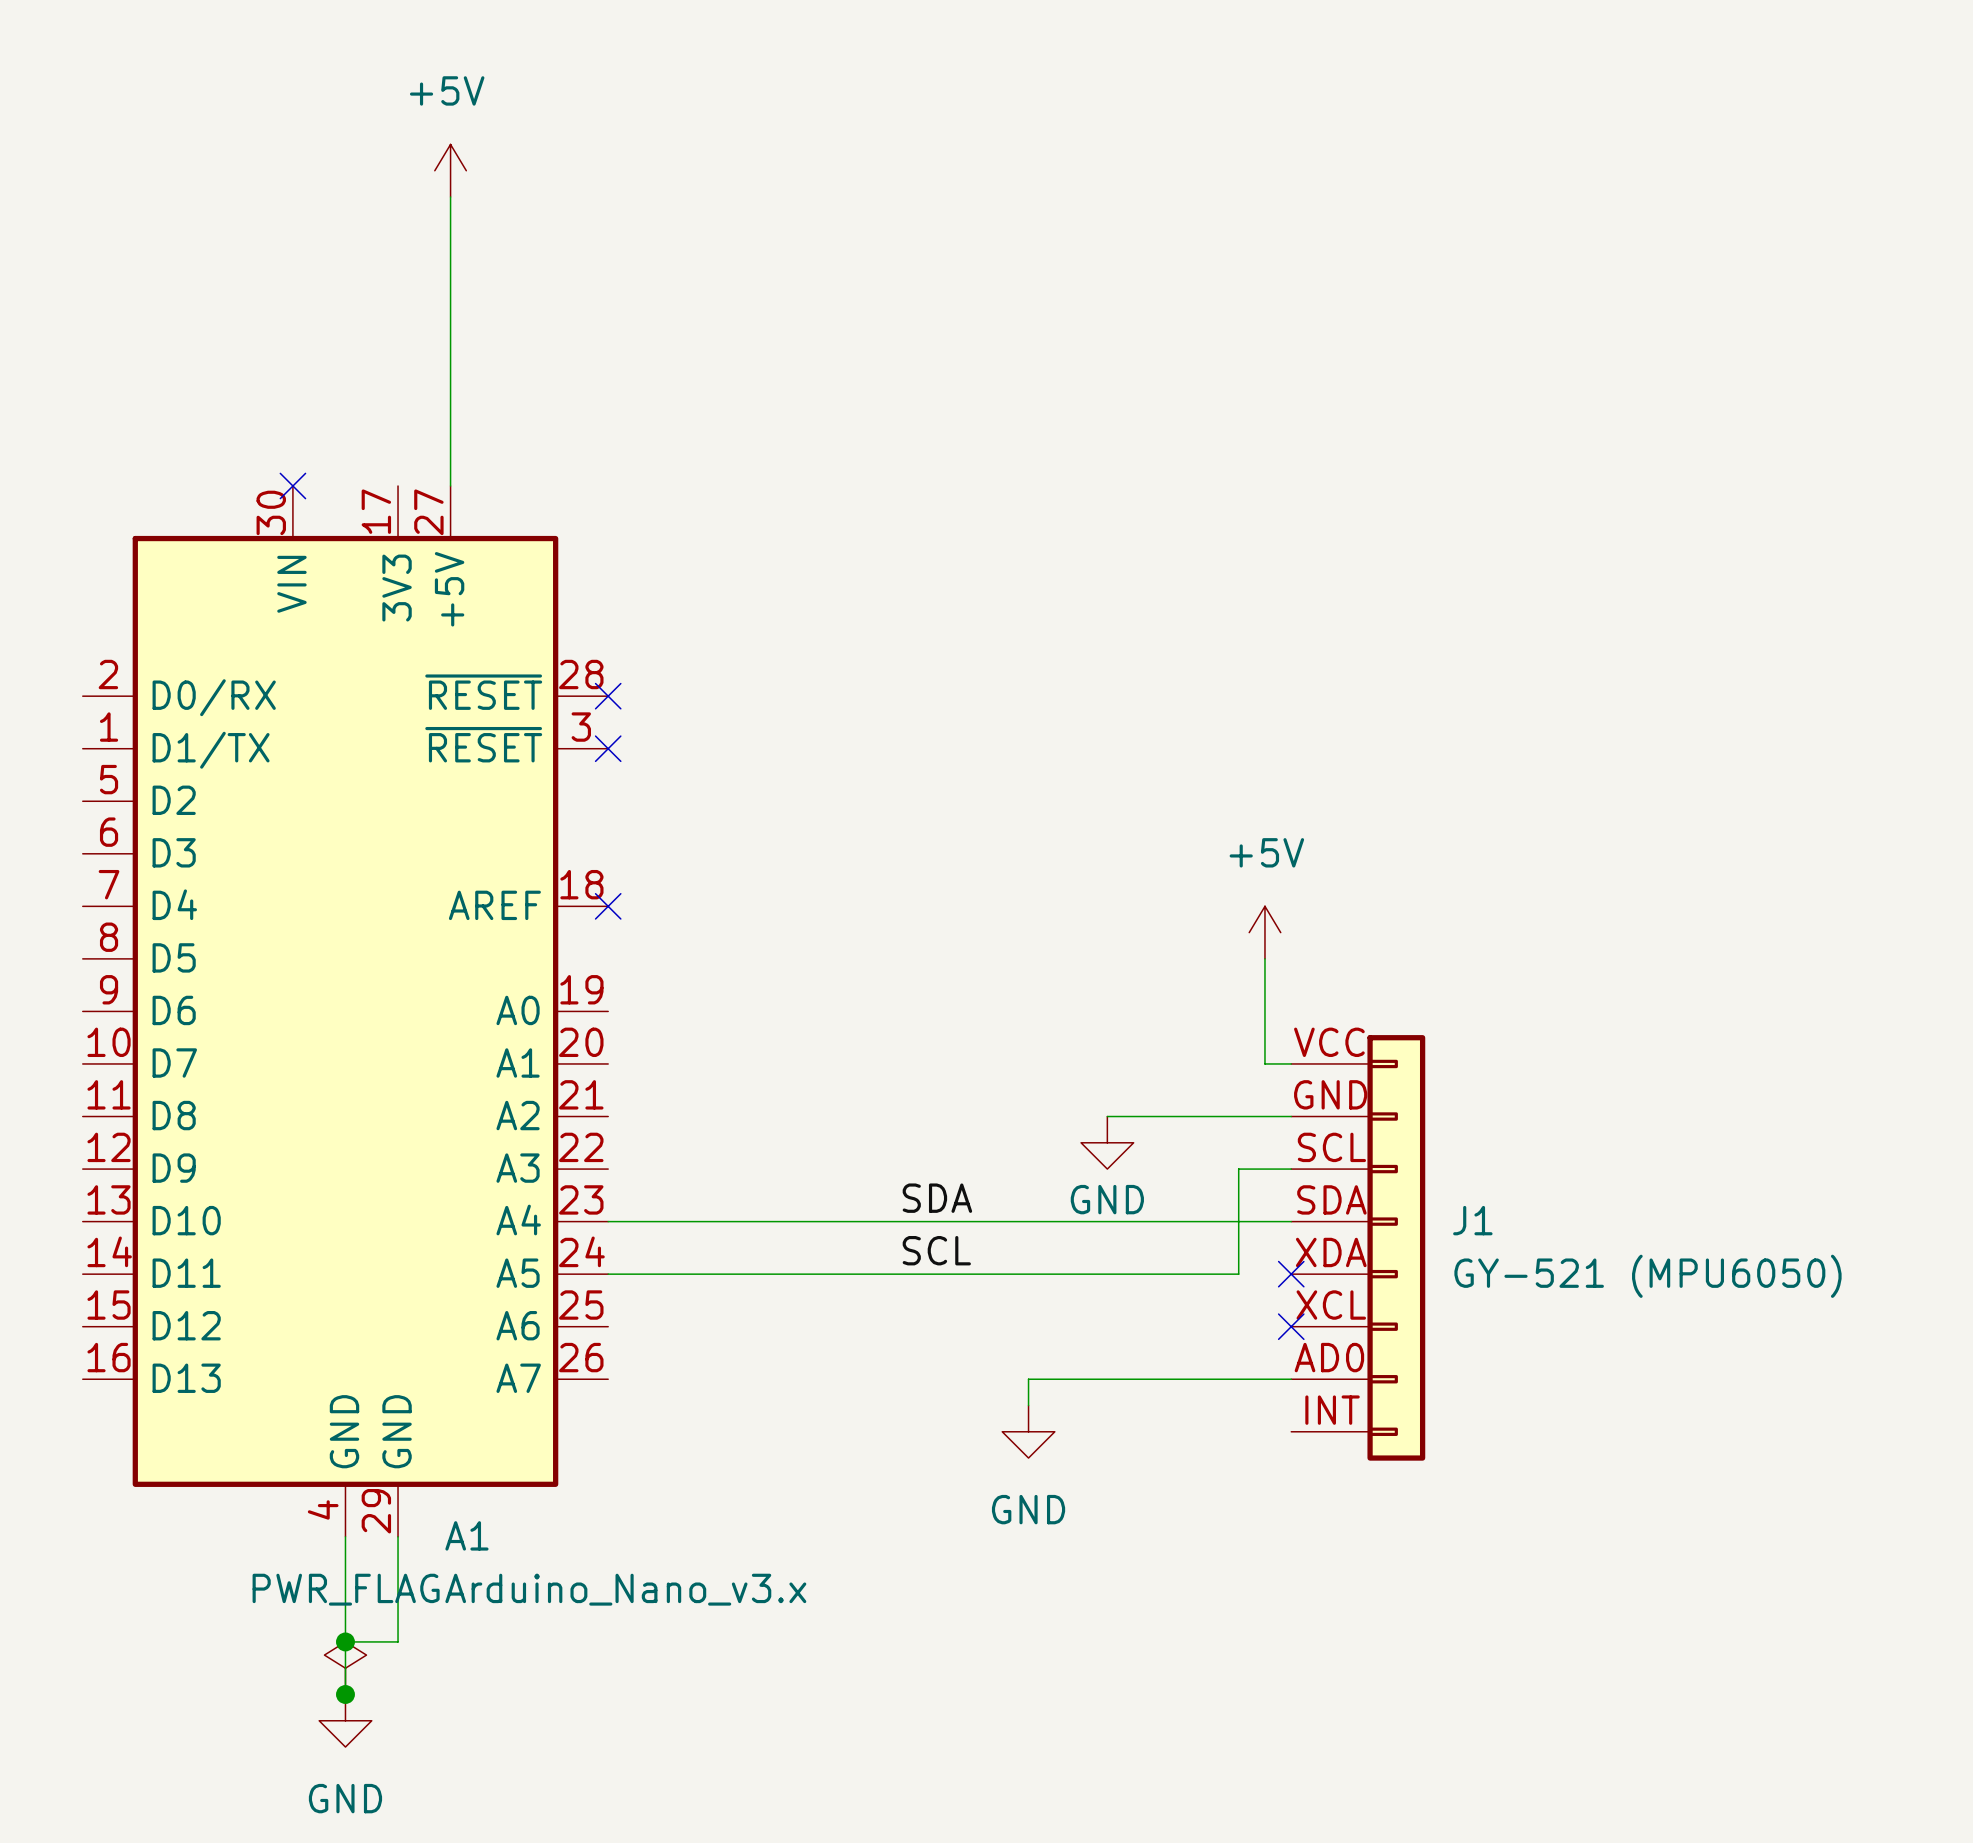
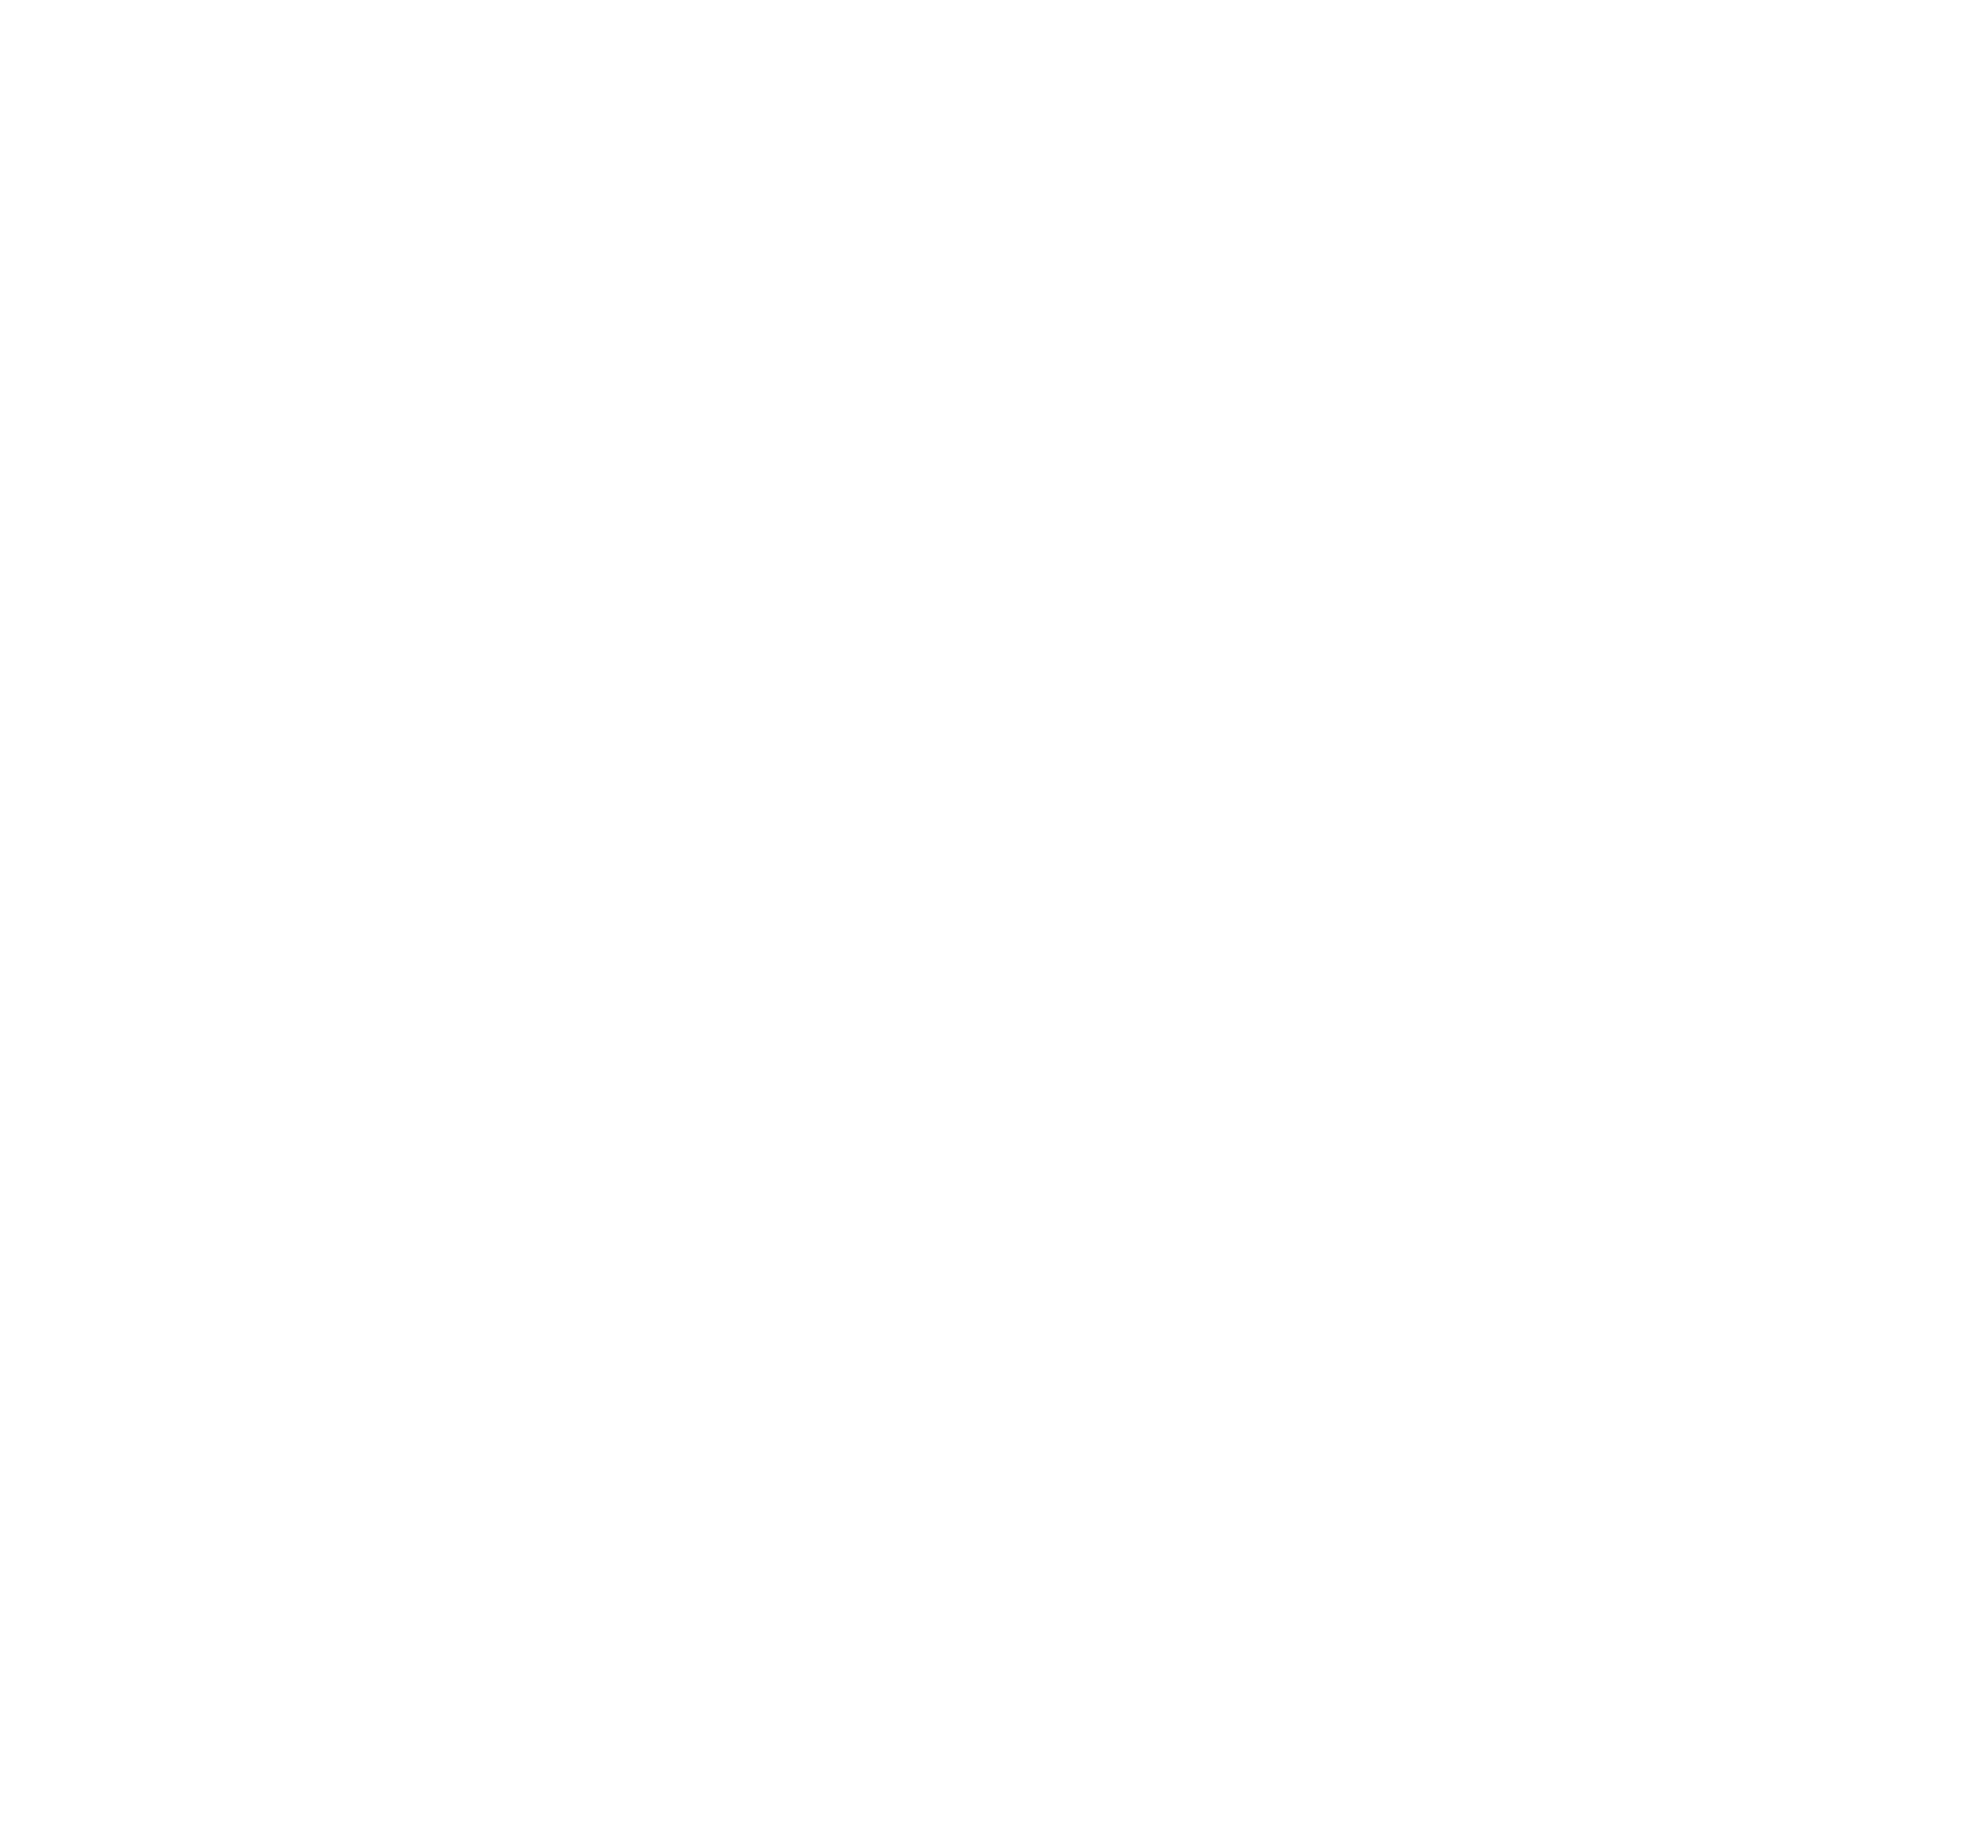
power symbol: +5V (450, 170) -> none
wire: (450, 197) (450, 486) -> none
no-connect mark: (292, 486) -> none
no-connect mark: (608, 696) -> none
no-connect mark: (608, 748) -> none
no-connect mark: (608, 906) -> none
power symbol: +5V (1264, 932) -> none
wire: (1264, 958) (1264, 1063) (1291, 1063) -> none
A1: Arduino_Nano_v3.x (345, 1011) -> none
wire: (1107, 1116) (1291, 1116) -> none
power symbol: GND (1107, 1142) -> none
wire: (1291, 1169) (1238, 1169) (1238, 1274) (608, 1274) -> none
label: SDA (937, 1198) -> none
wire: (608, 1221) (1291, 1221) -> none
J1: GY-521 (MPU6050) (1358, 1247) -> none
label: SCL (936, 1250) -> none
no-connect mark: (1291, 1274) -> none
no-connect mark: (1291, 1326) -> none
wire: (1291, 1379) (1028, 1379) (1028, 1405) -> none
power symbol: GND (1028, 1431) -> none
wire: (345, 1536) (345, 1694) -> none
wire: (398, 1536) (398, 1641) (345, 1641) -> none
junction: (345, 1641) -> none
power symbol: PWR_FLAG (345, 1668) -> none
junction: (345, 1694) -> none
power symbol: GND (345, 1720) -> none

